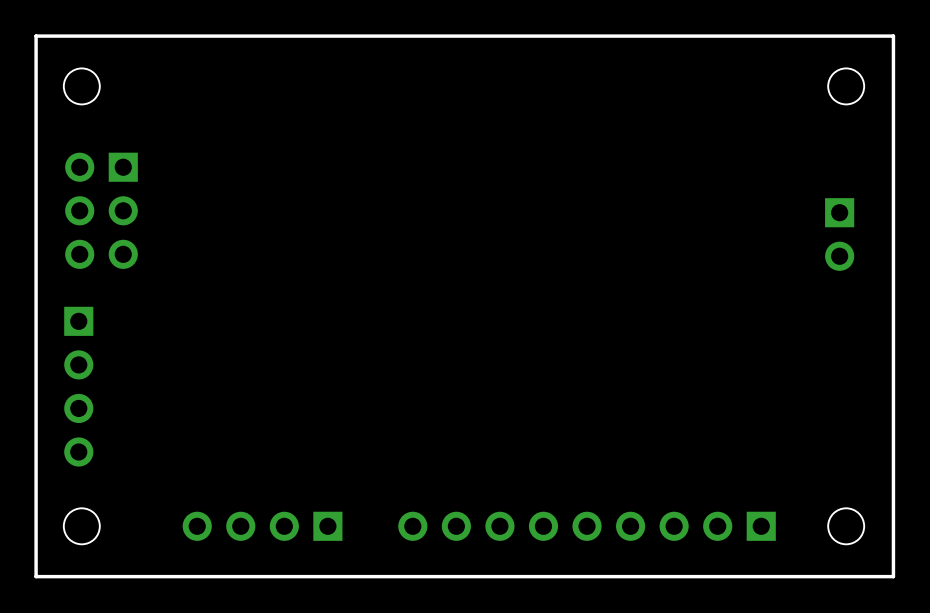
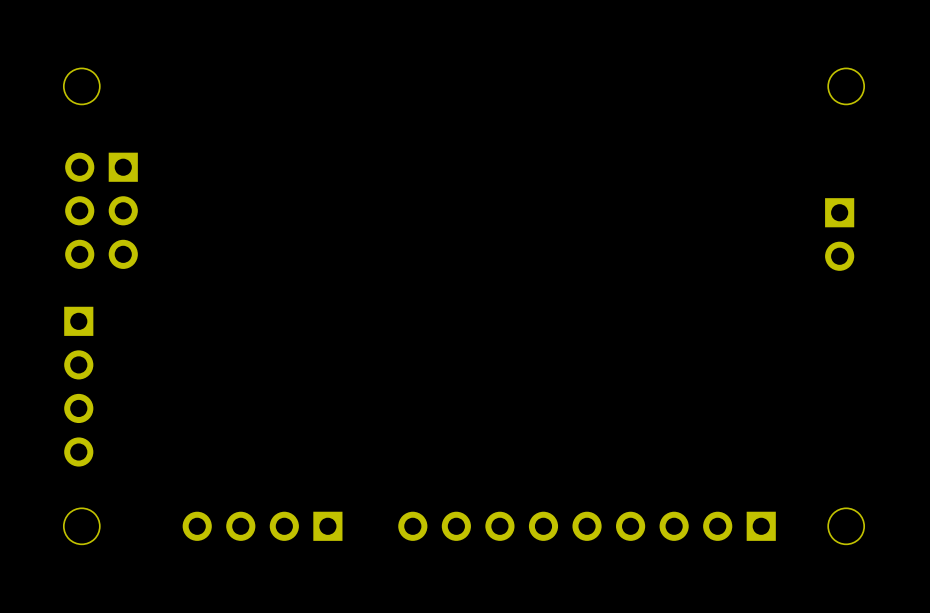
board edge: (893, 36) (36, 36) (36, 576) (893, 576) (893, 36) -> none

